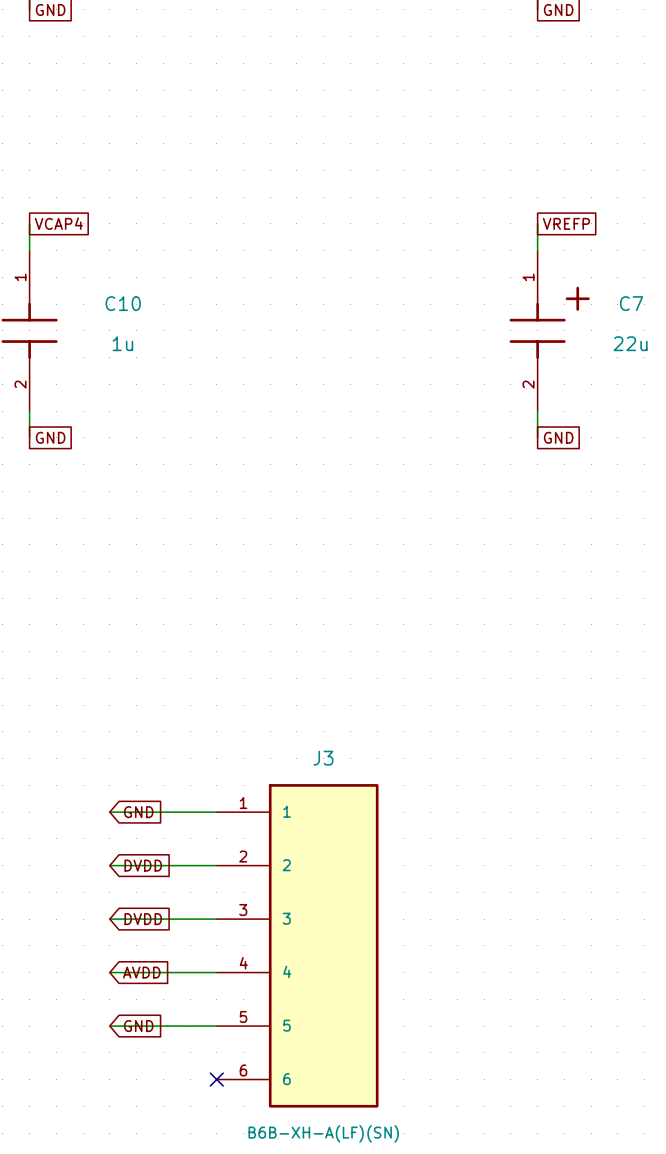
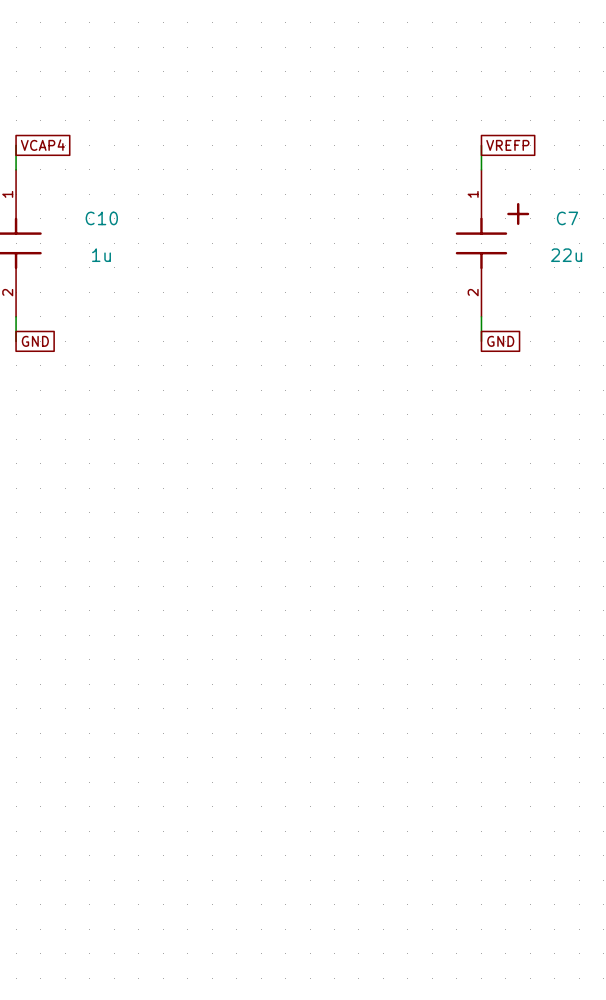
wire: (109, 812) (216, 812) -> none
global label: GND (138, 812) -> none
wire: (109, 865) (216, 865) -> none
global label: DVDD (143, 865) -> none
wire: (109, 919) (216, 919) -> none
global label: DVDD (143, 919) -> none
J3: B6B-XH-A(LF)(SN) (297, 945) -> none
wire: (109, 972) (216, 972) -> none
global label: AVDD (141, 972) -> none
wire: (109, 1026) (216, 1026) -> none
global label: GND (138, 1026) -> none
no-connect mark: (216, 1079) -> none

